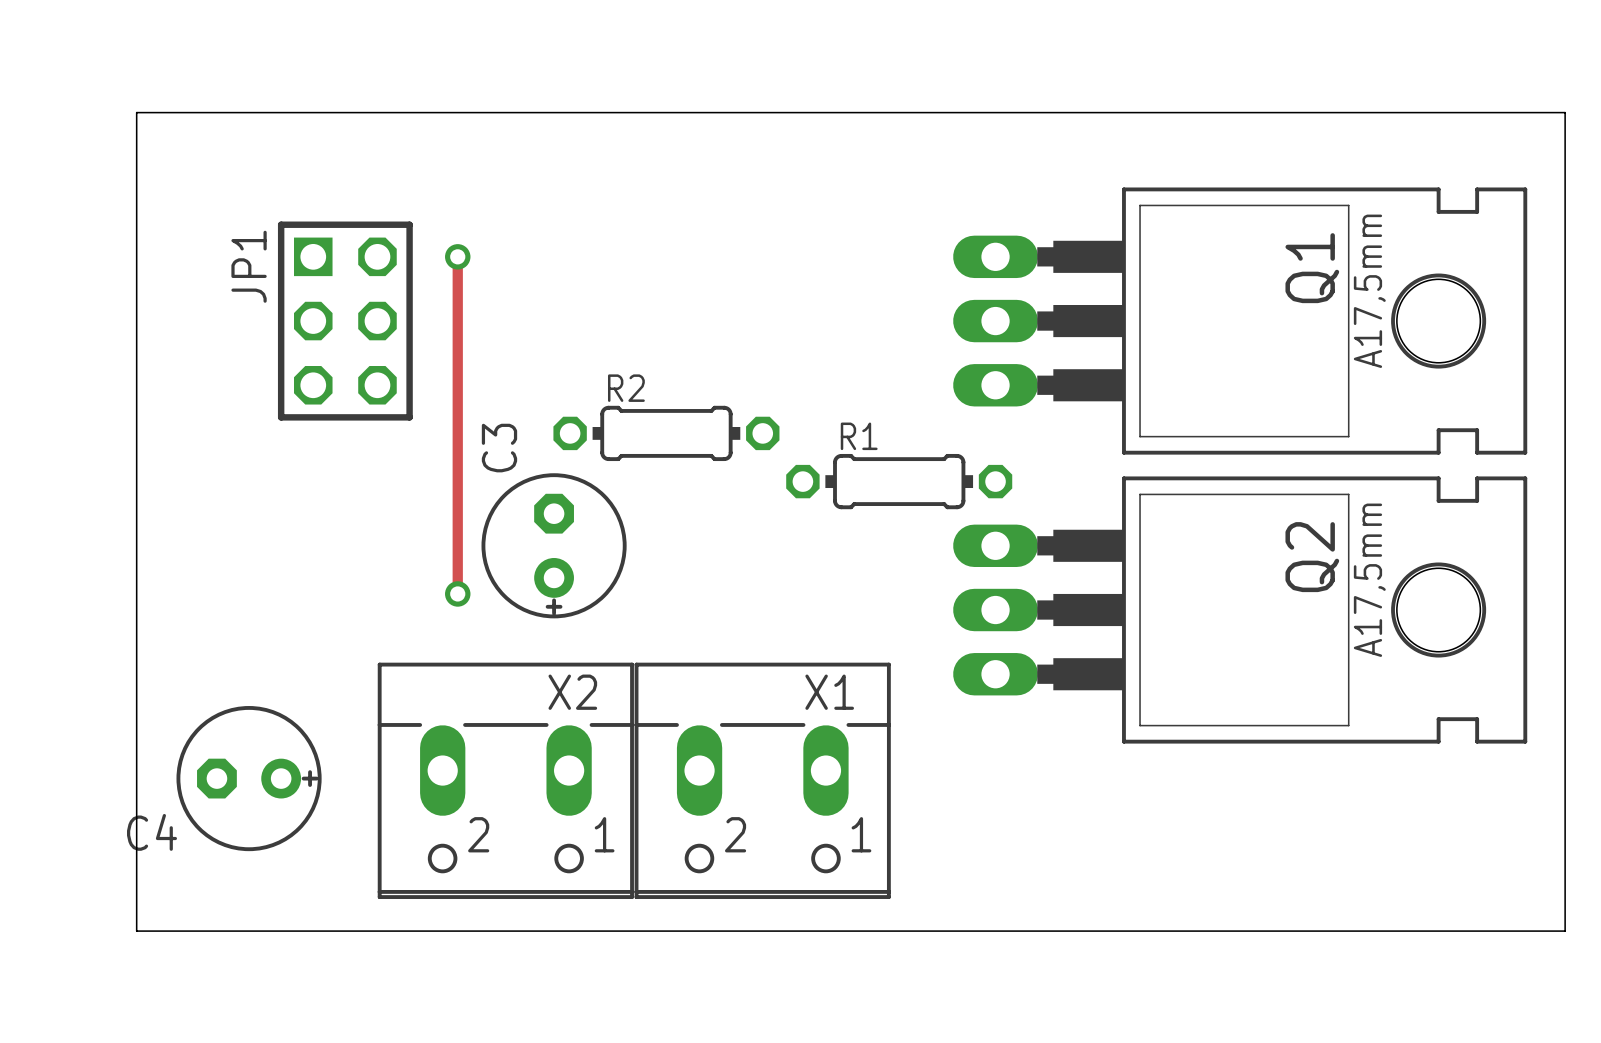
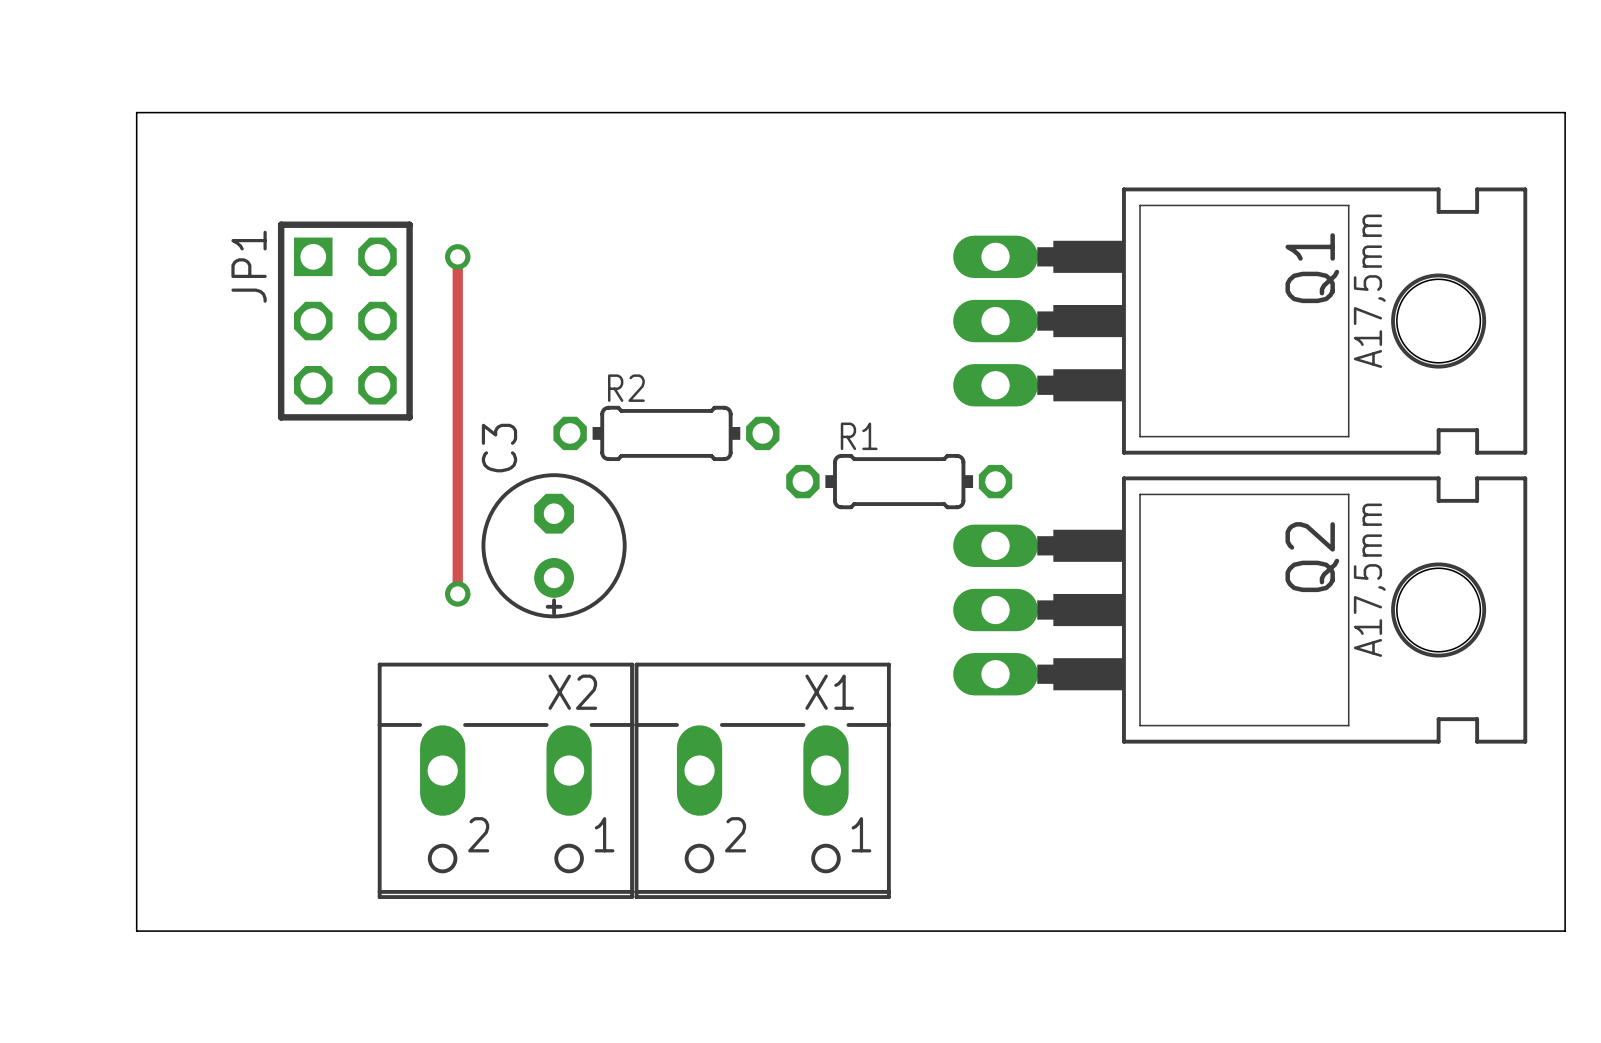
C4: (249, 778) -> none

